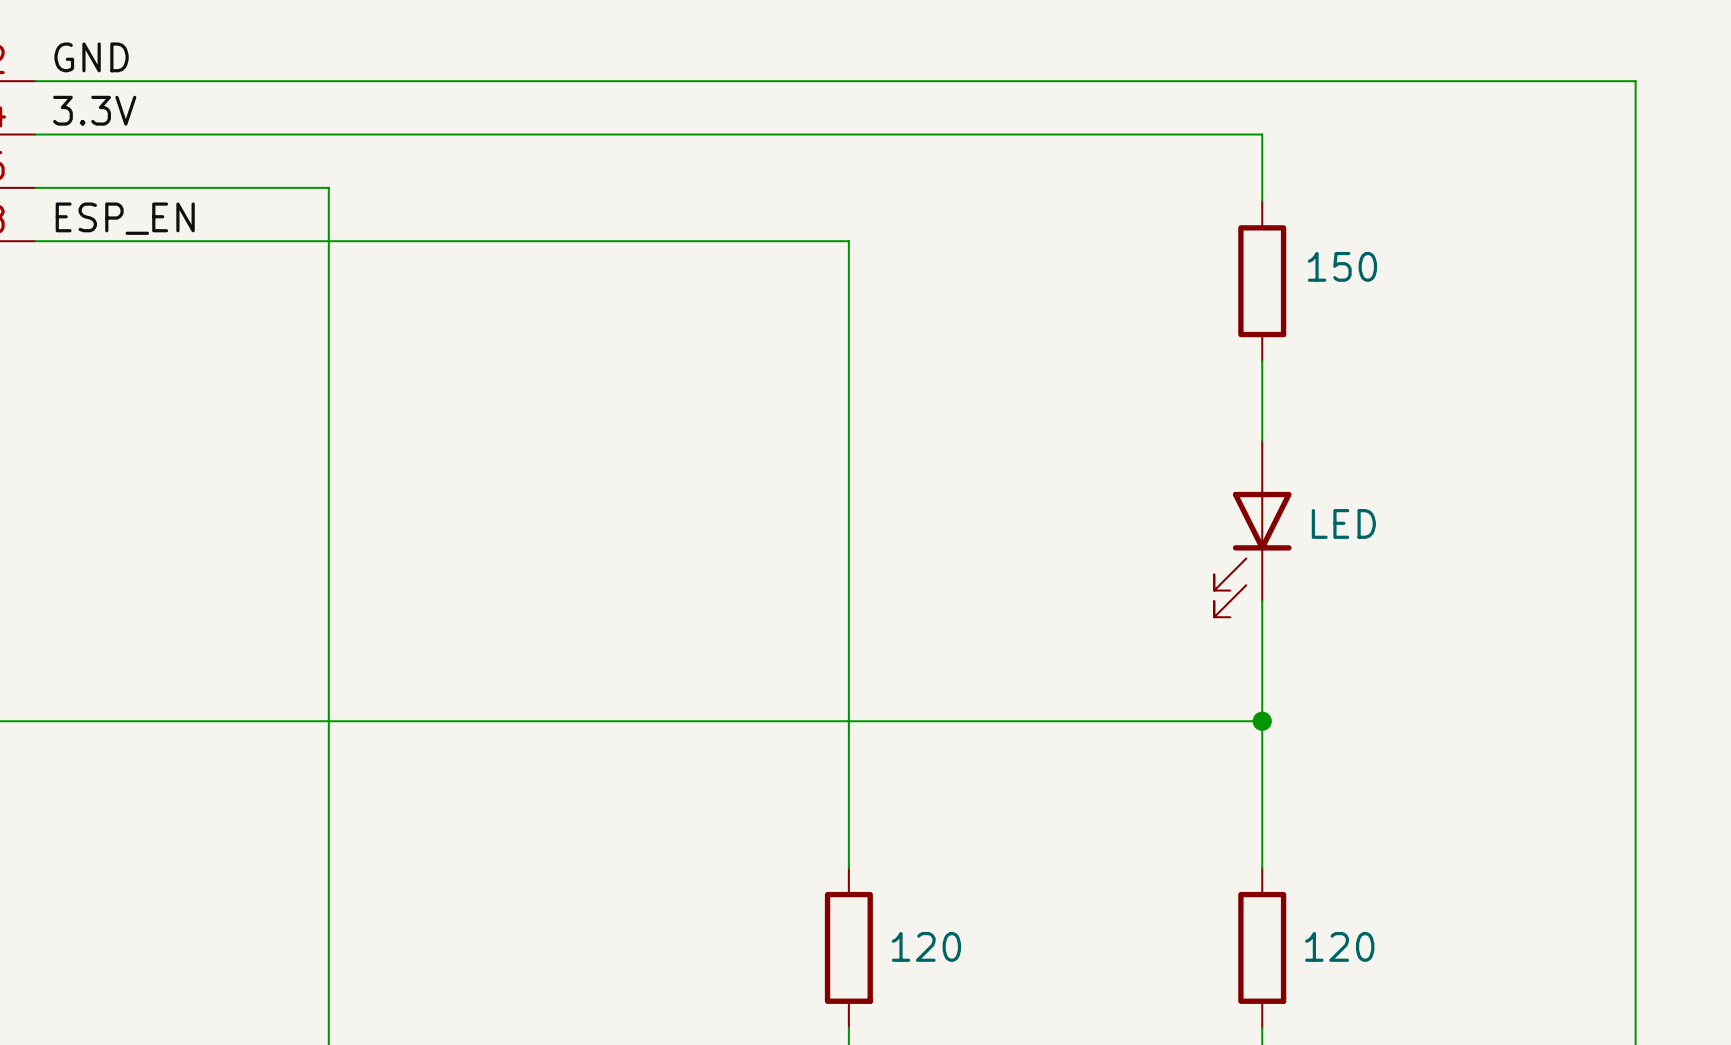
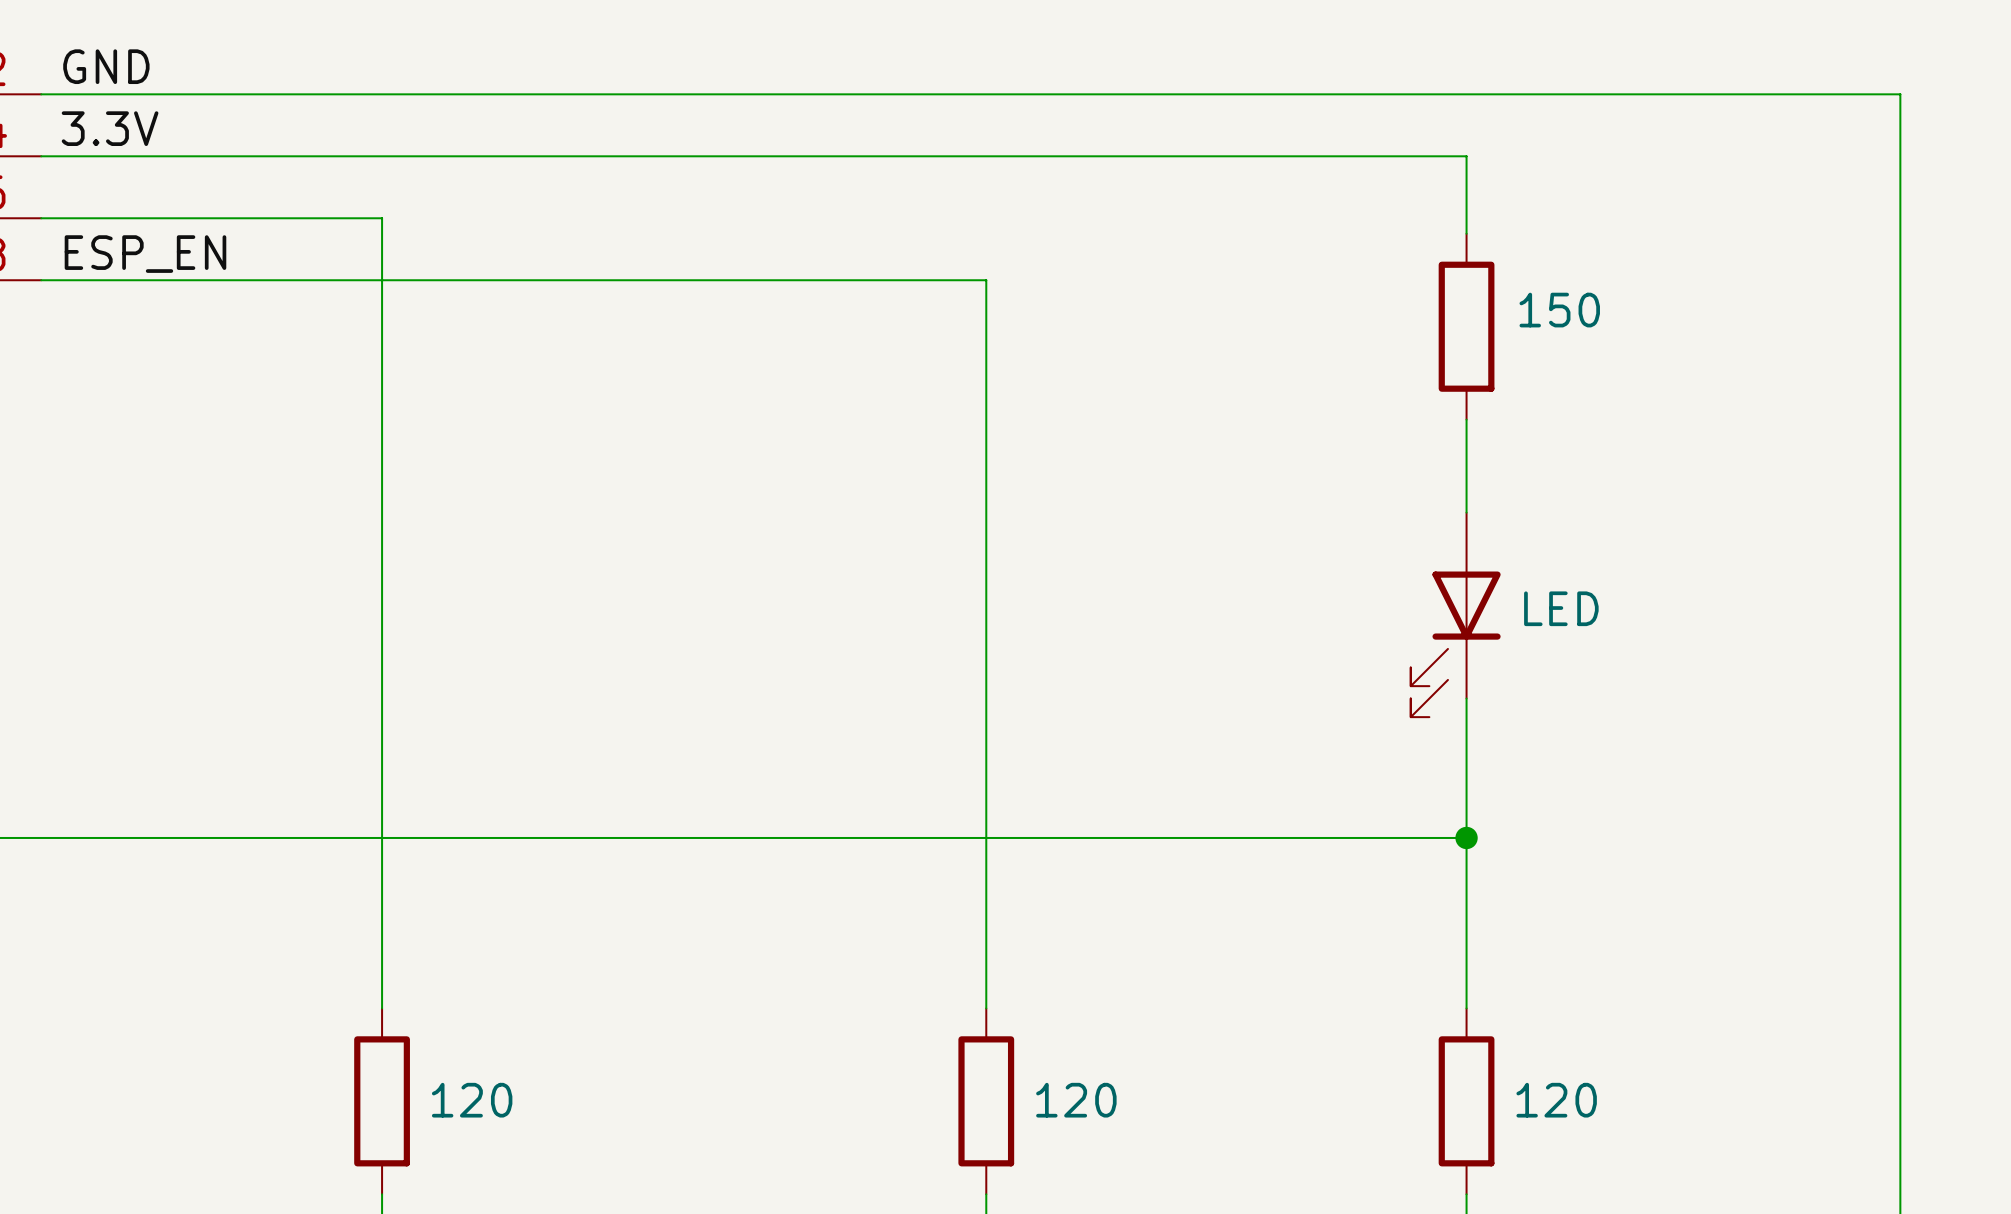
wire: (328, 867) (328, 1027) -> none
part: none -> 120 (382, 1101)

